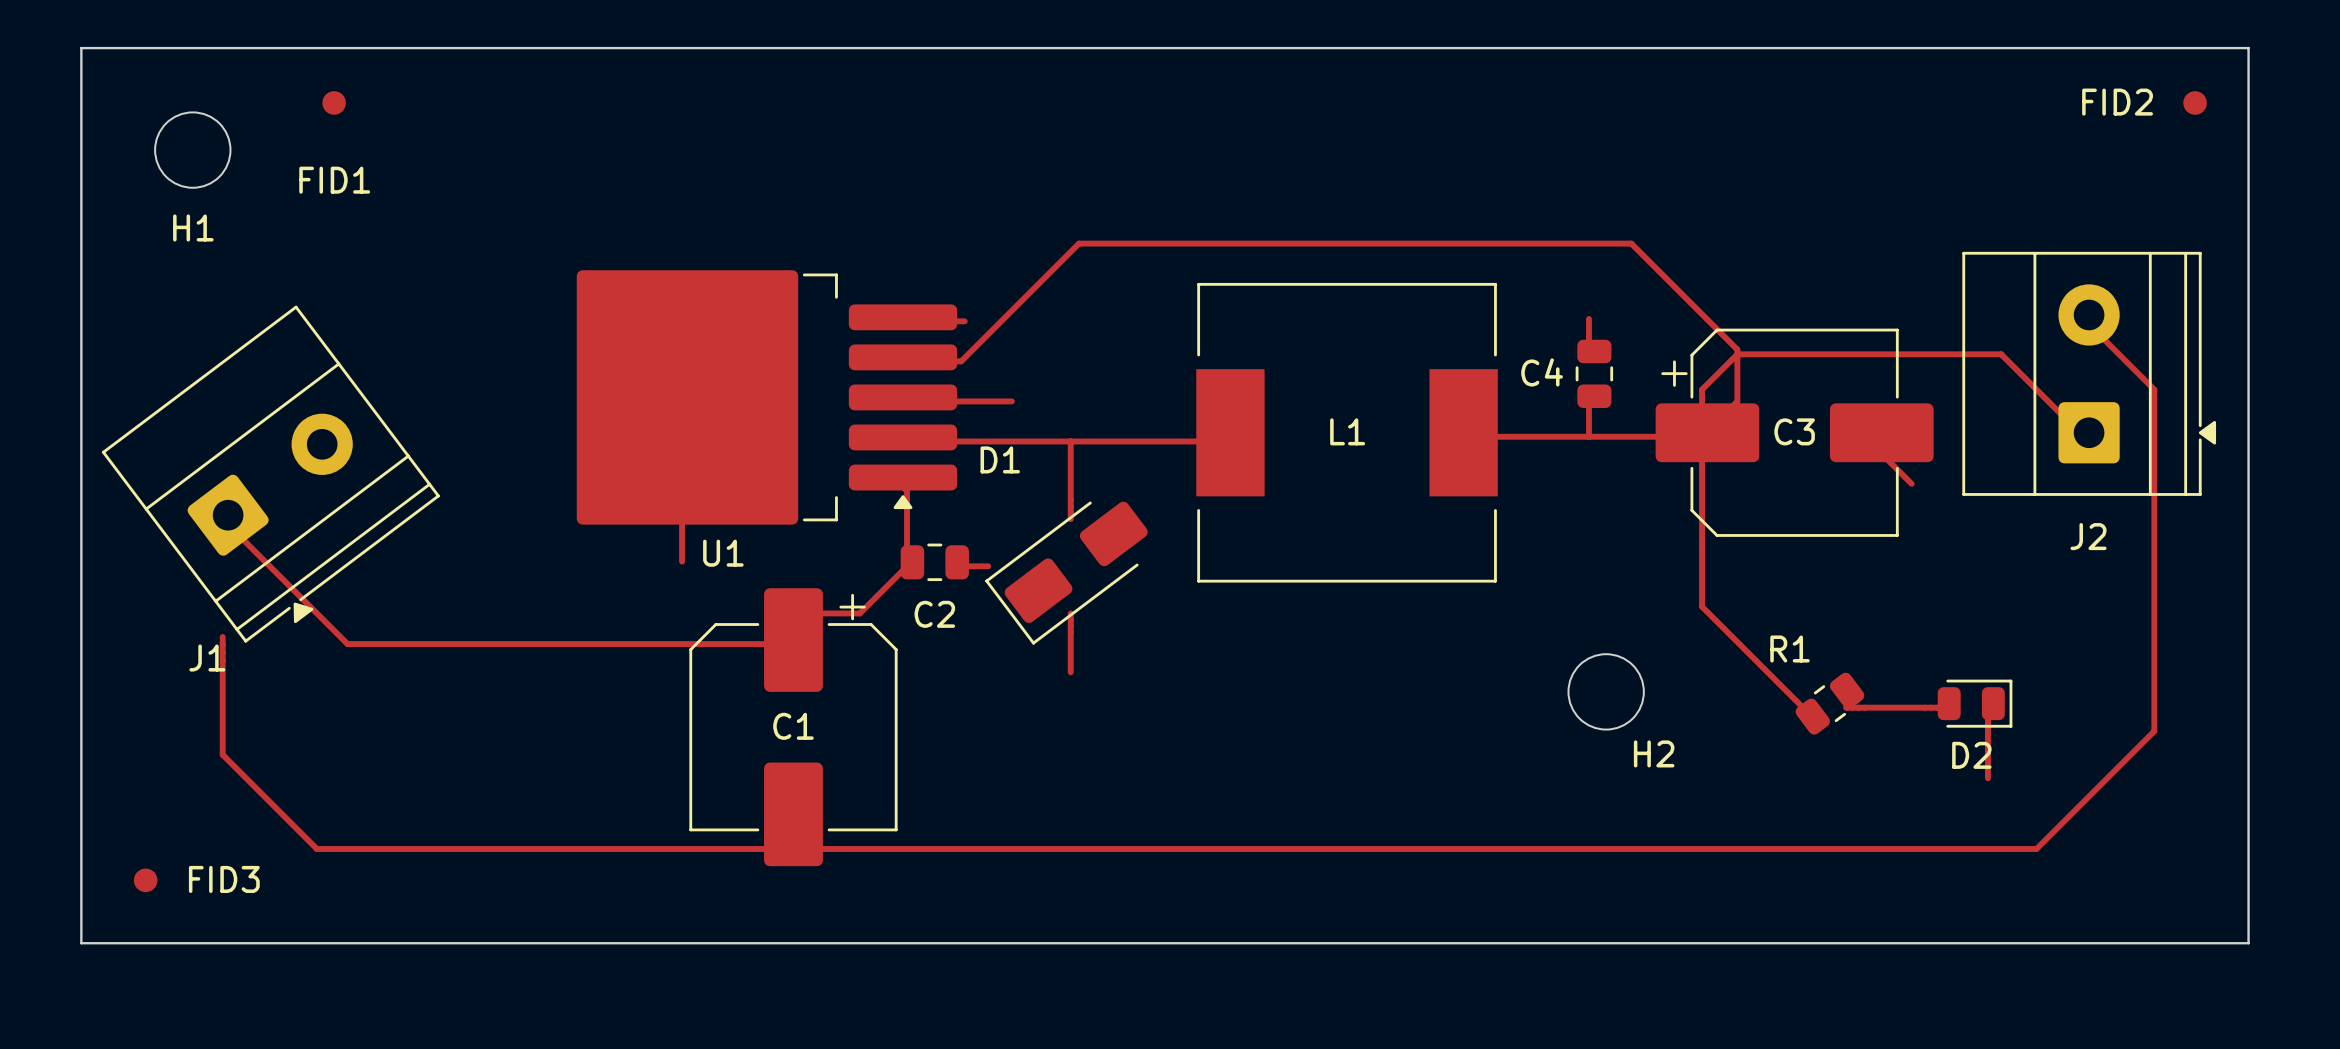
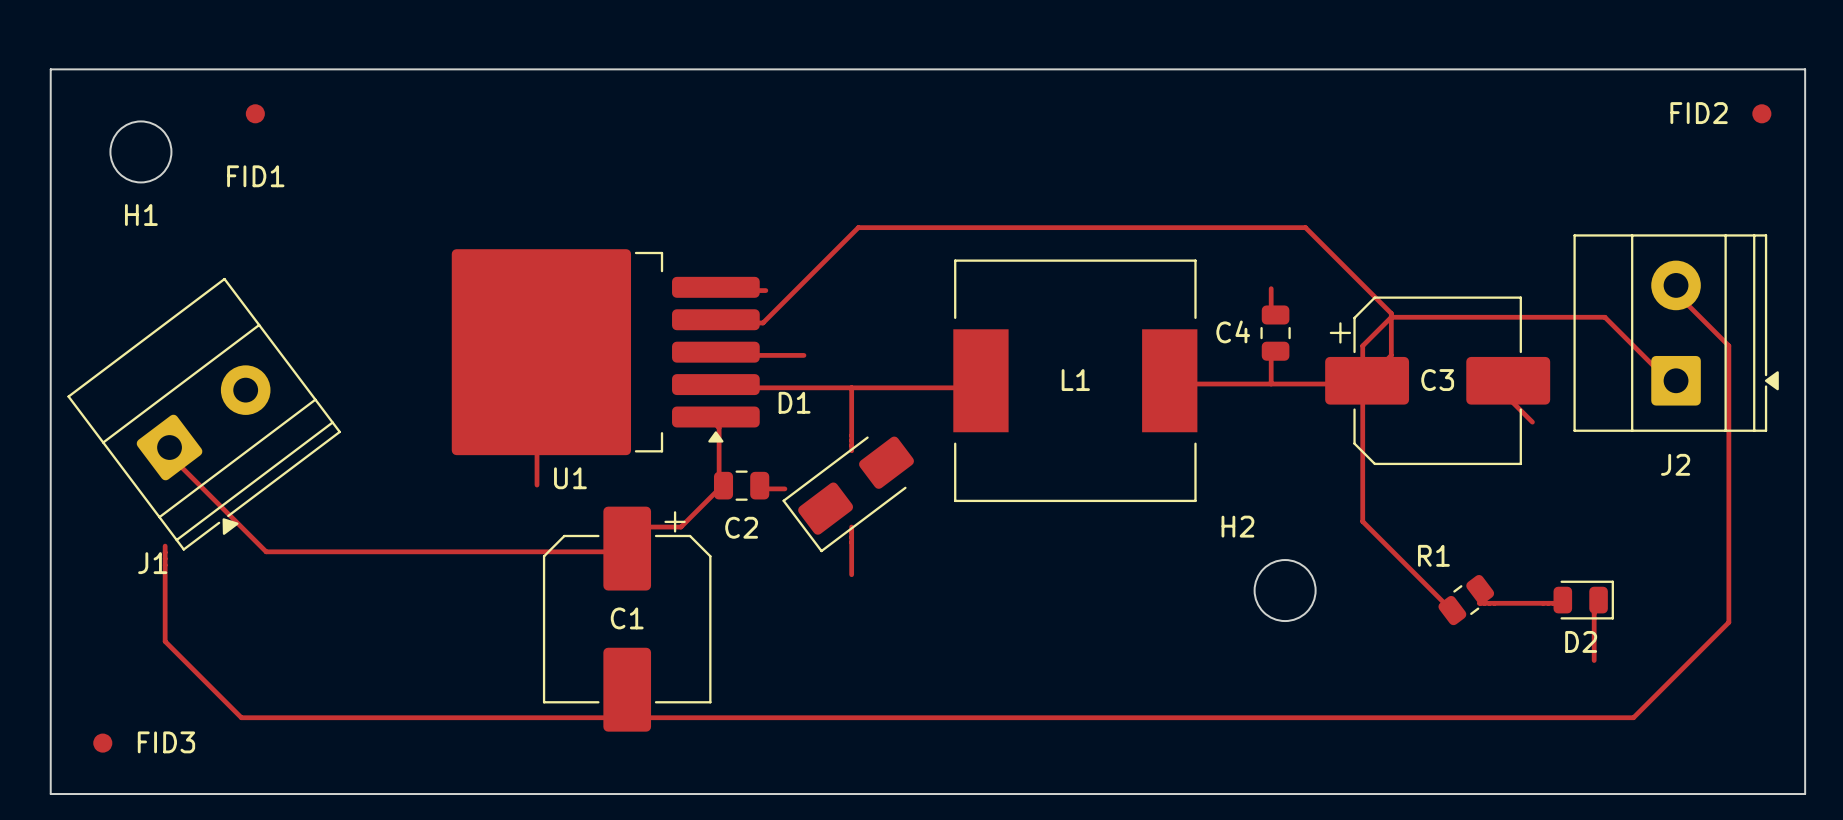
H2 name position: H2 (1654, 753) -> H2 (1237, 526)

